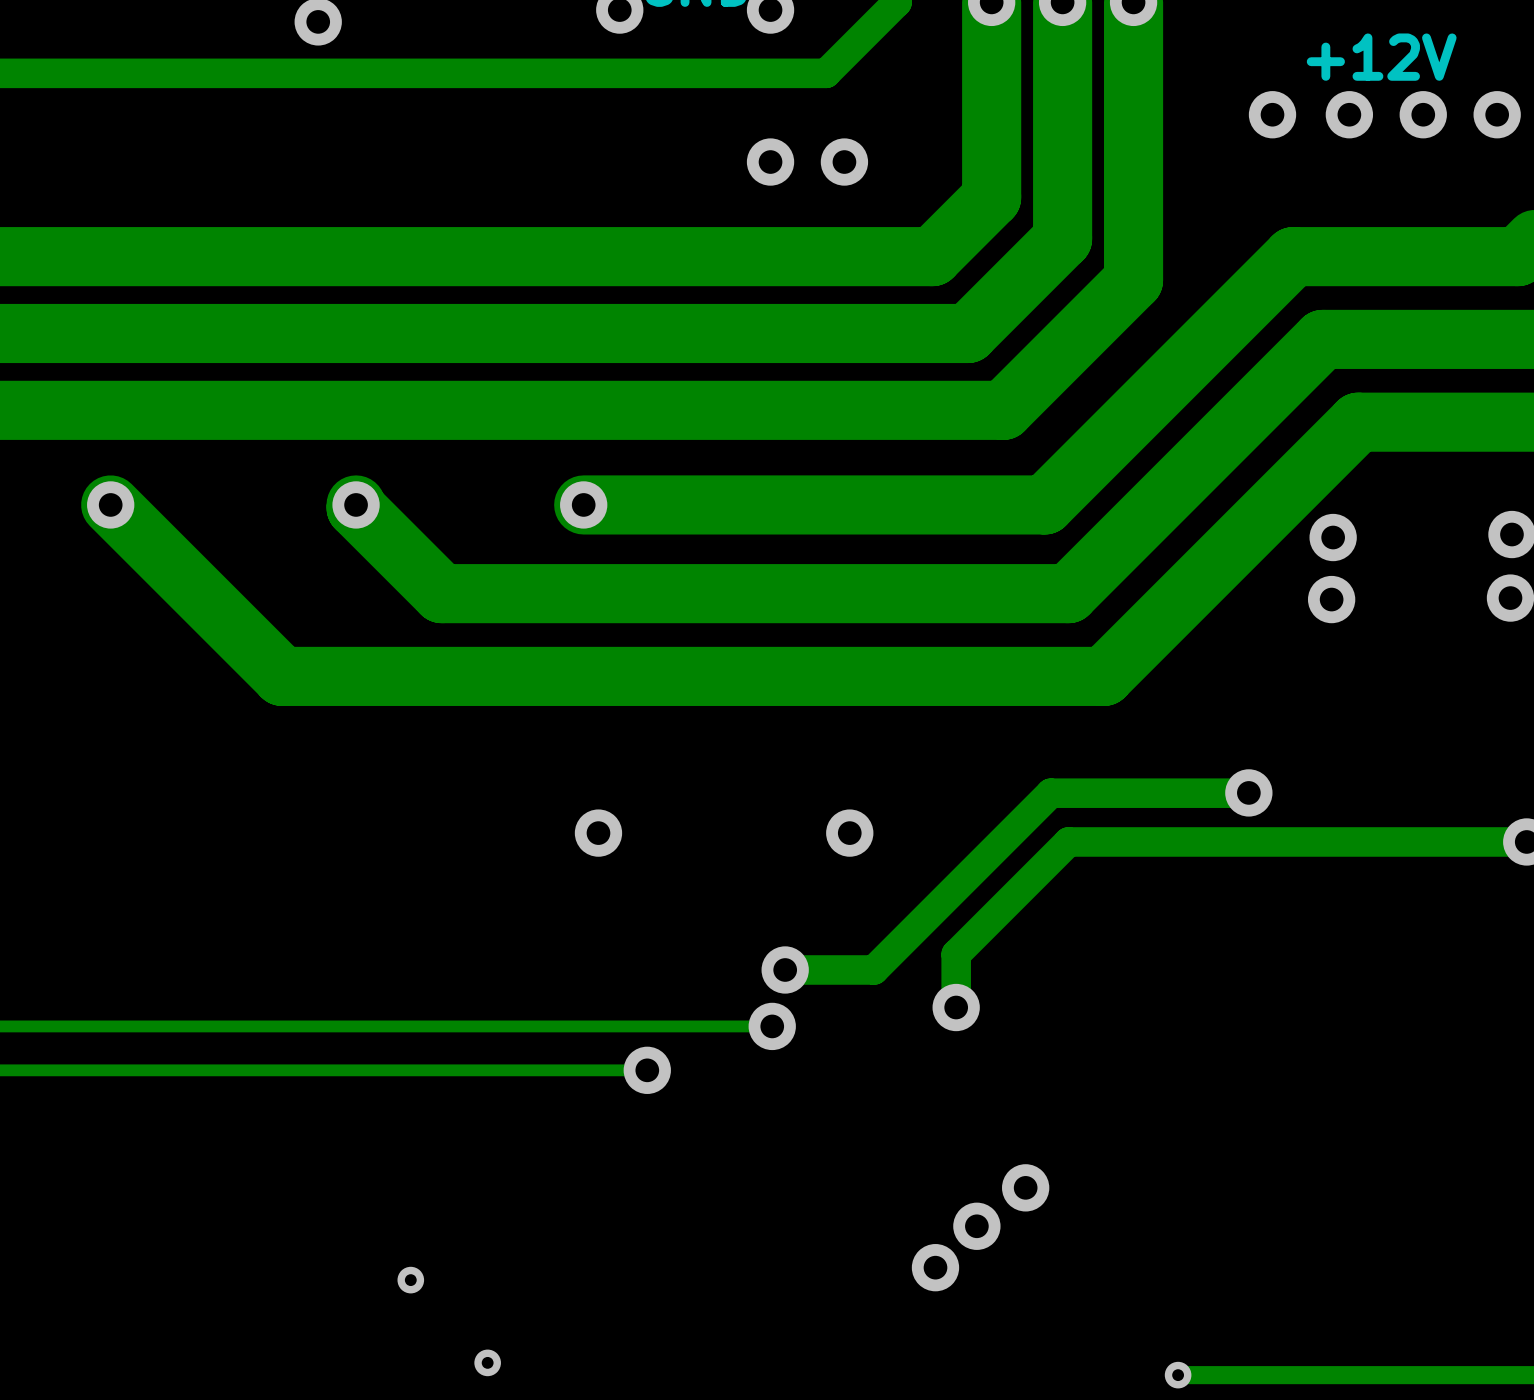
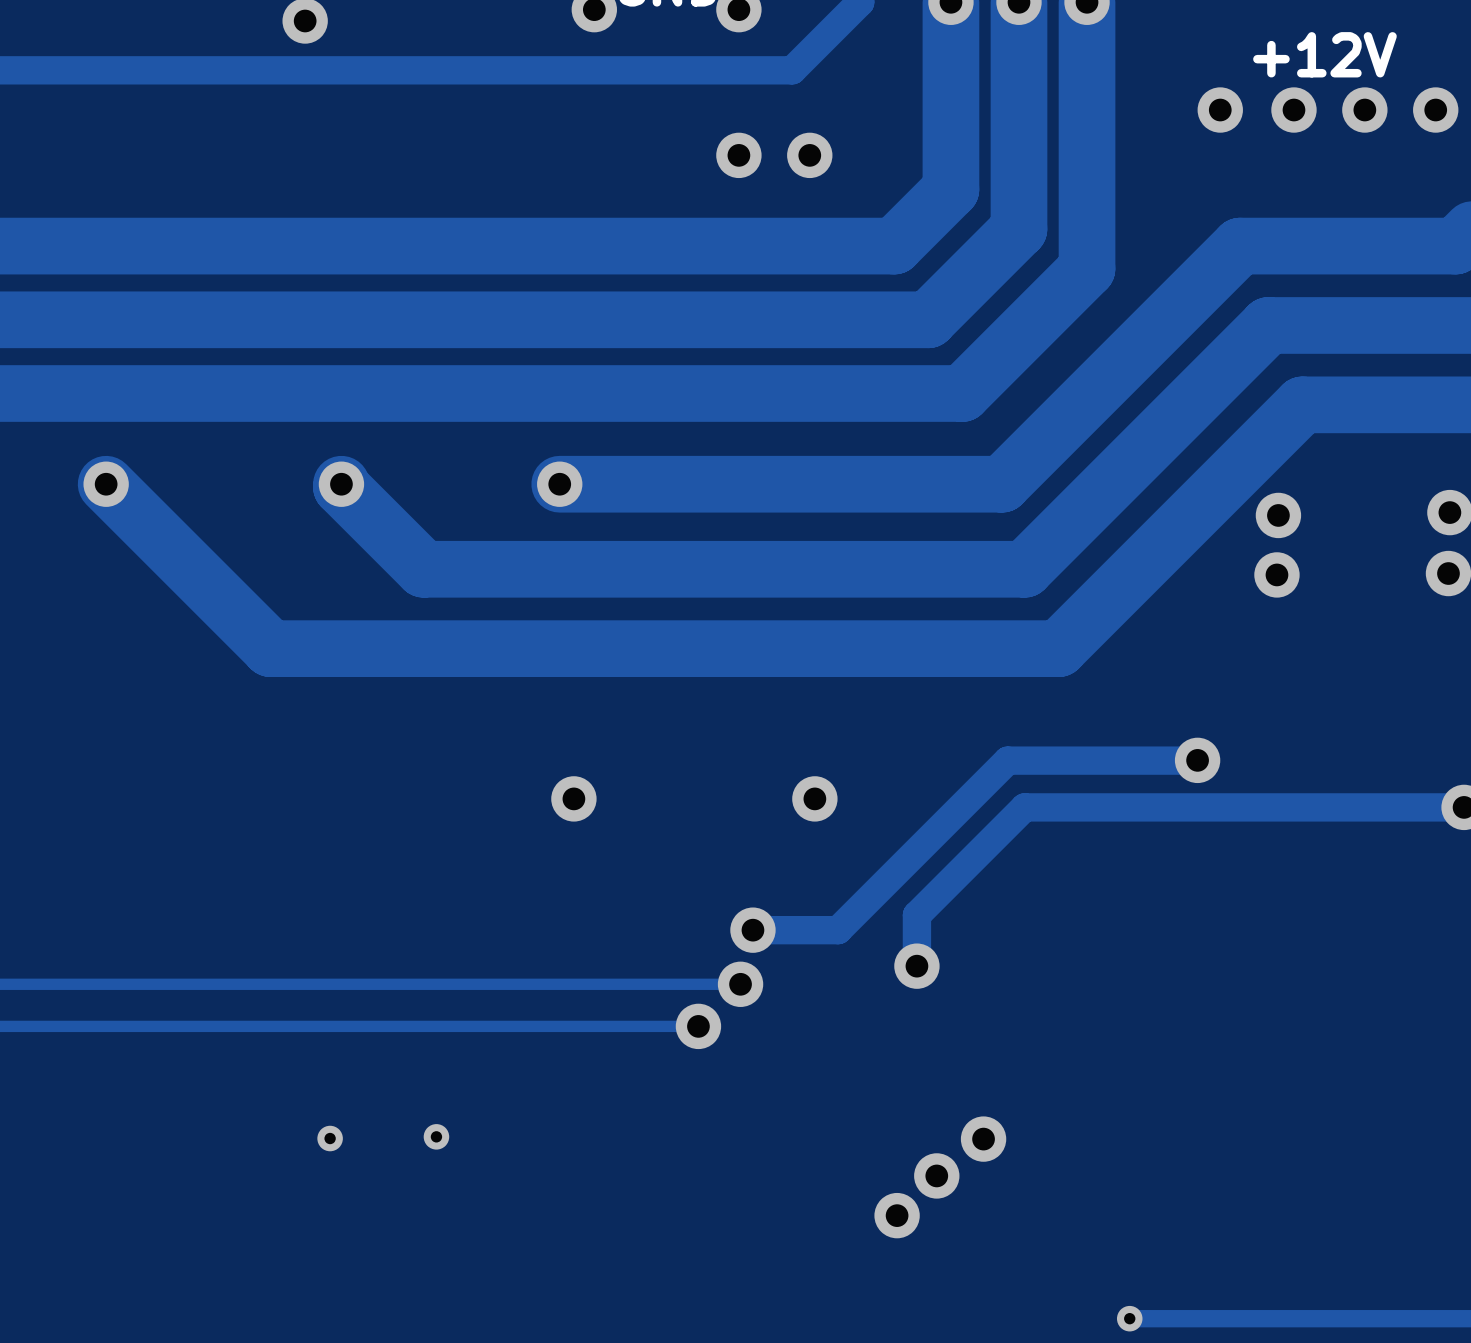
via position: (647, 1070) -> (698, 1026)
track: none -> (698, 1026) (620, 1026)
via: none -> (436, 1136)
via: none -> (330, 1138)
via: (410, 1280) -> none
via: (487, 1362) -> none

